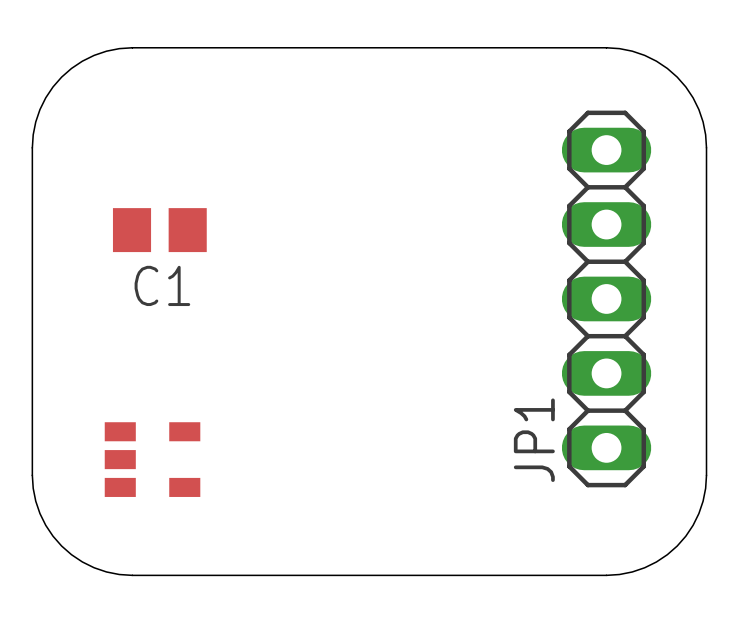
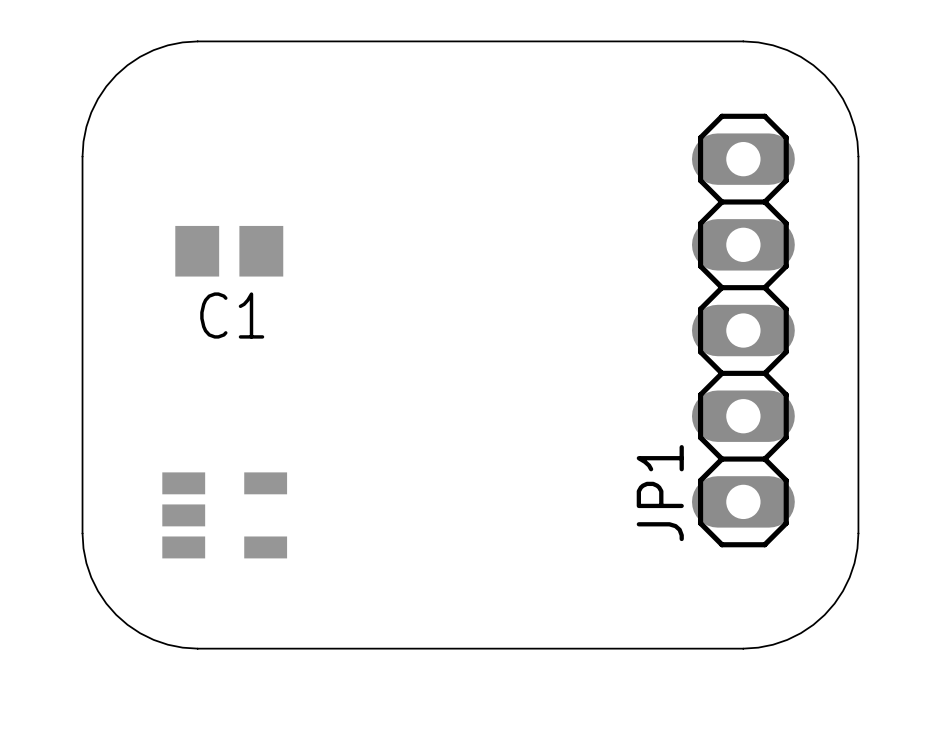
part footprint: [104, 422, 201, 497] -> [162, 472, 288, 559]

